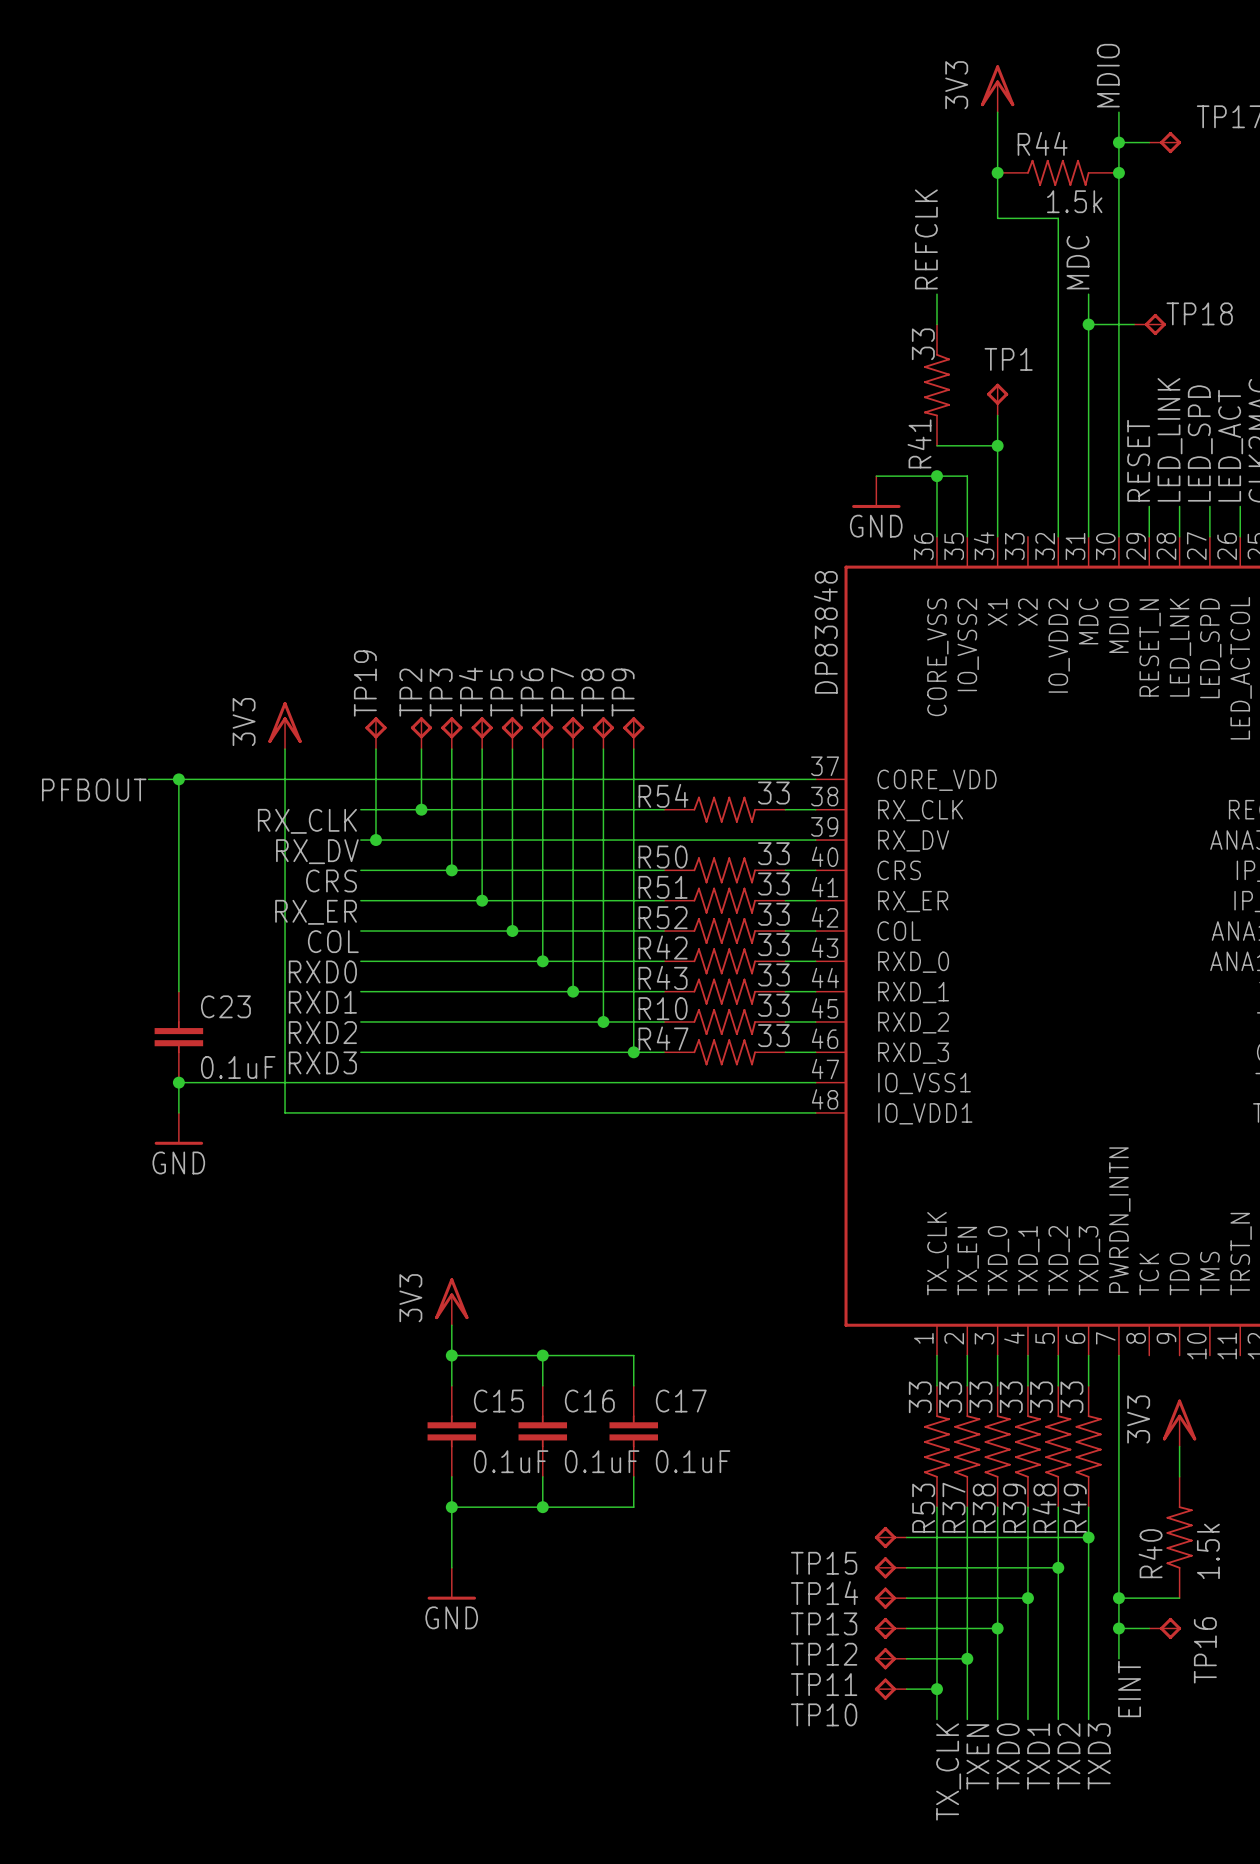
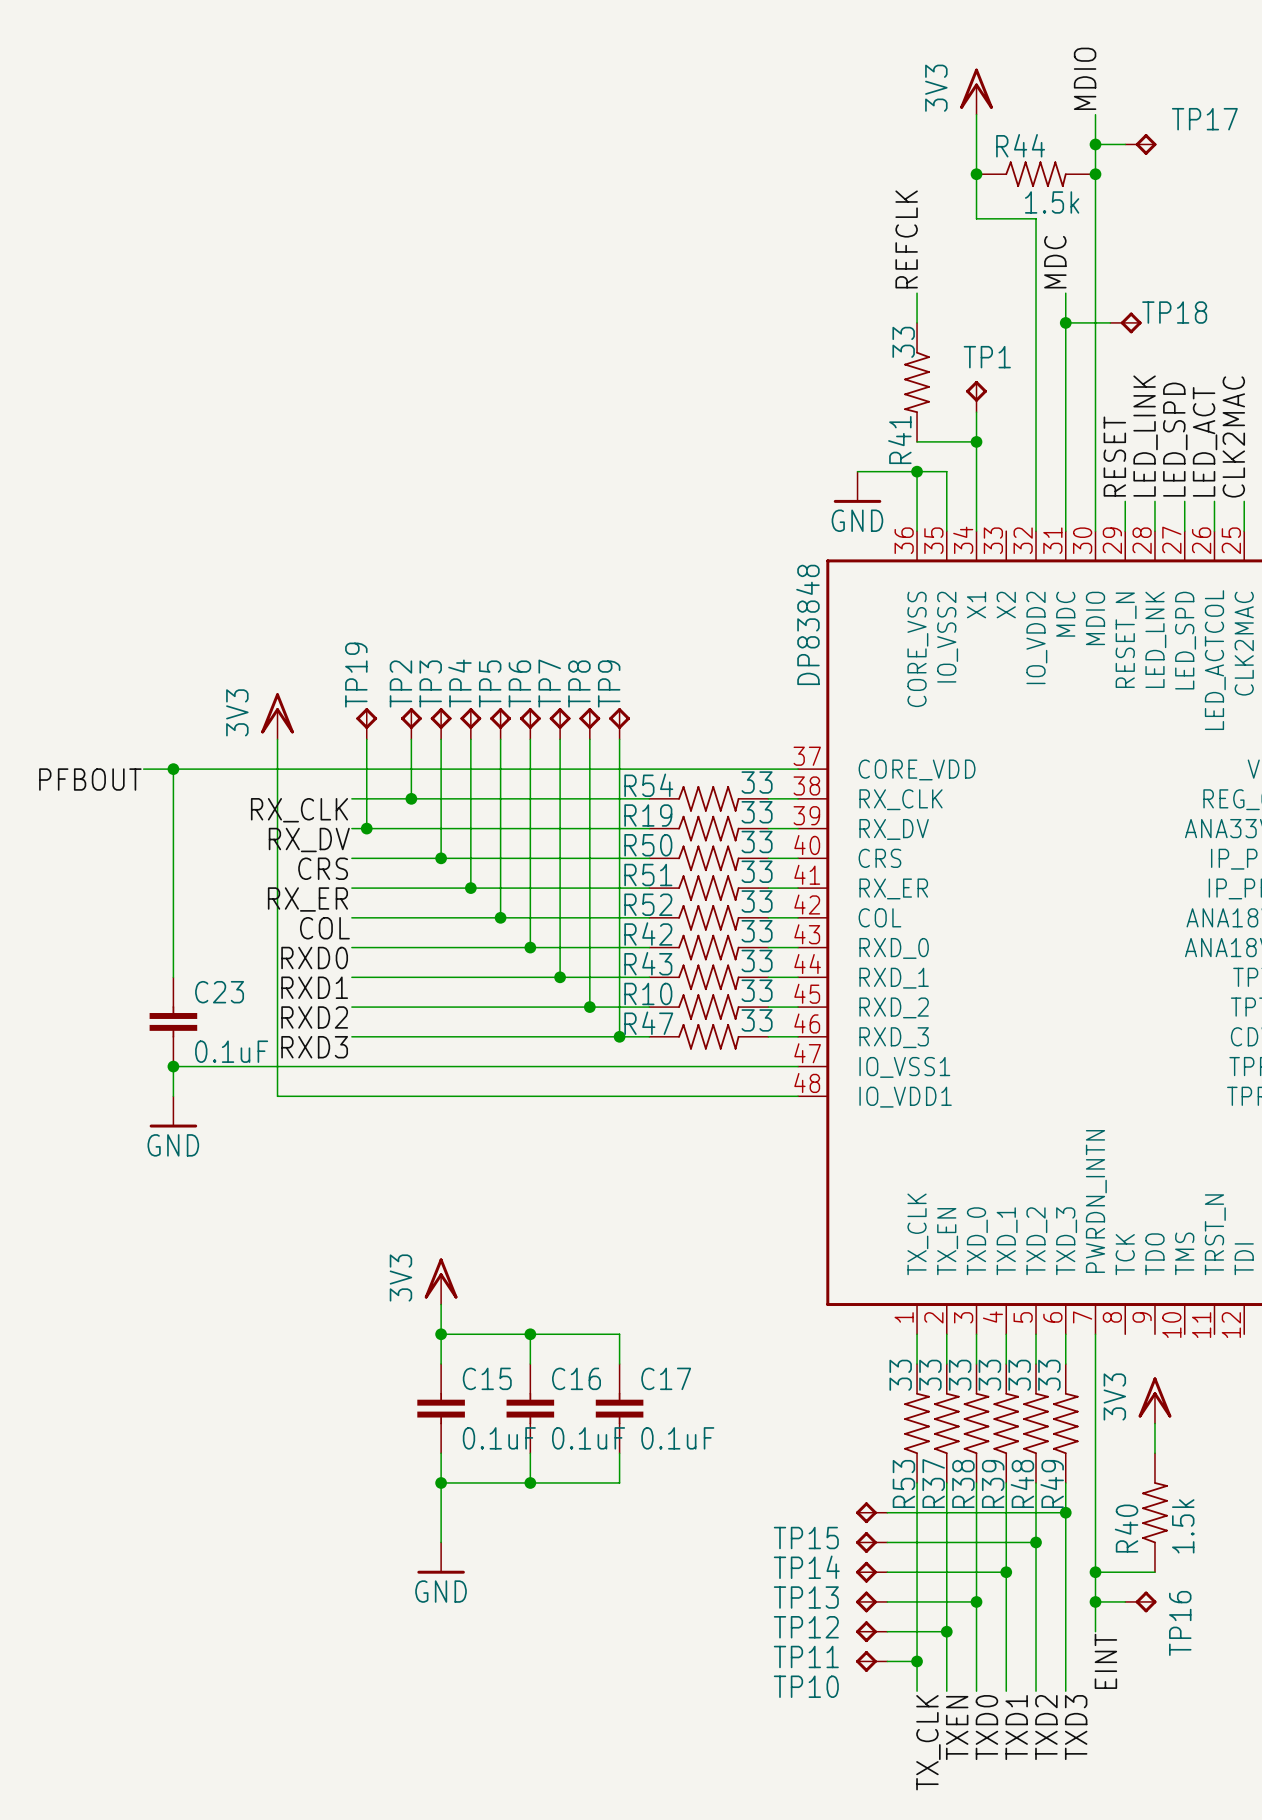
R19: none -> 33 (708, 828)

